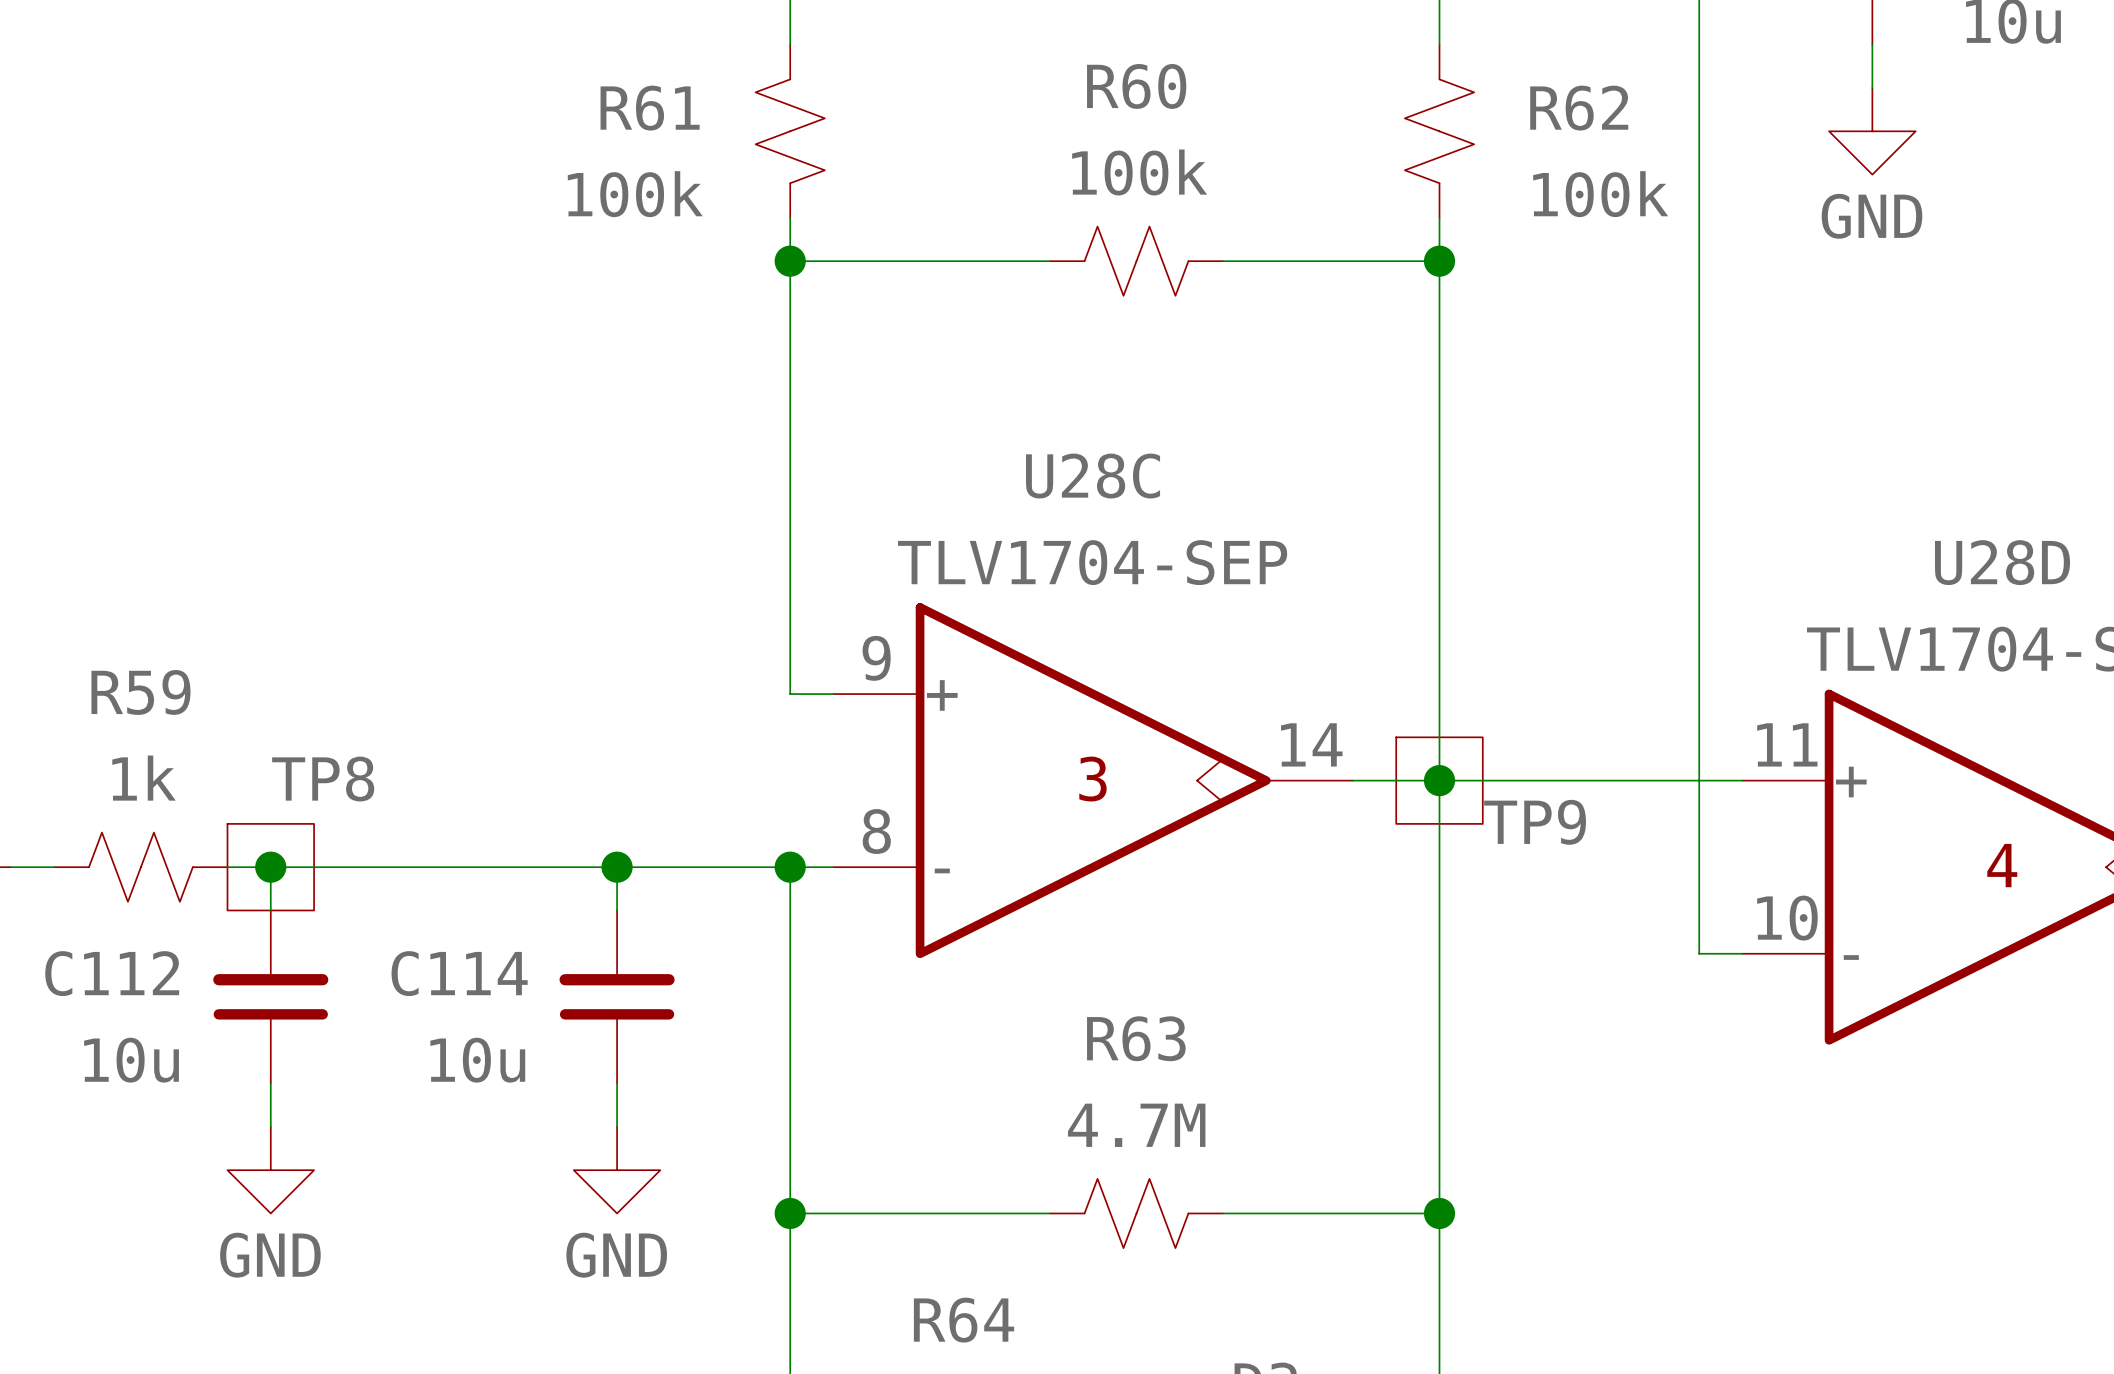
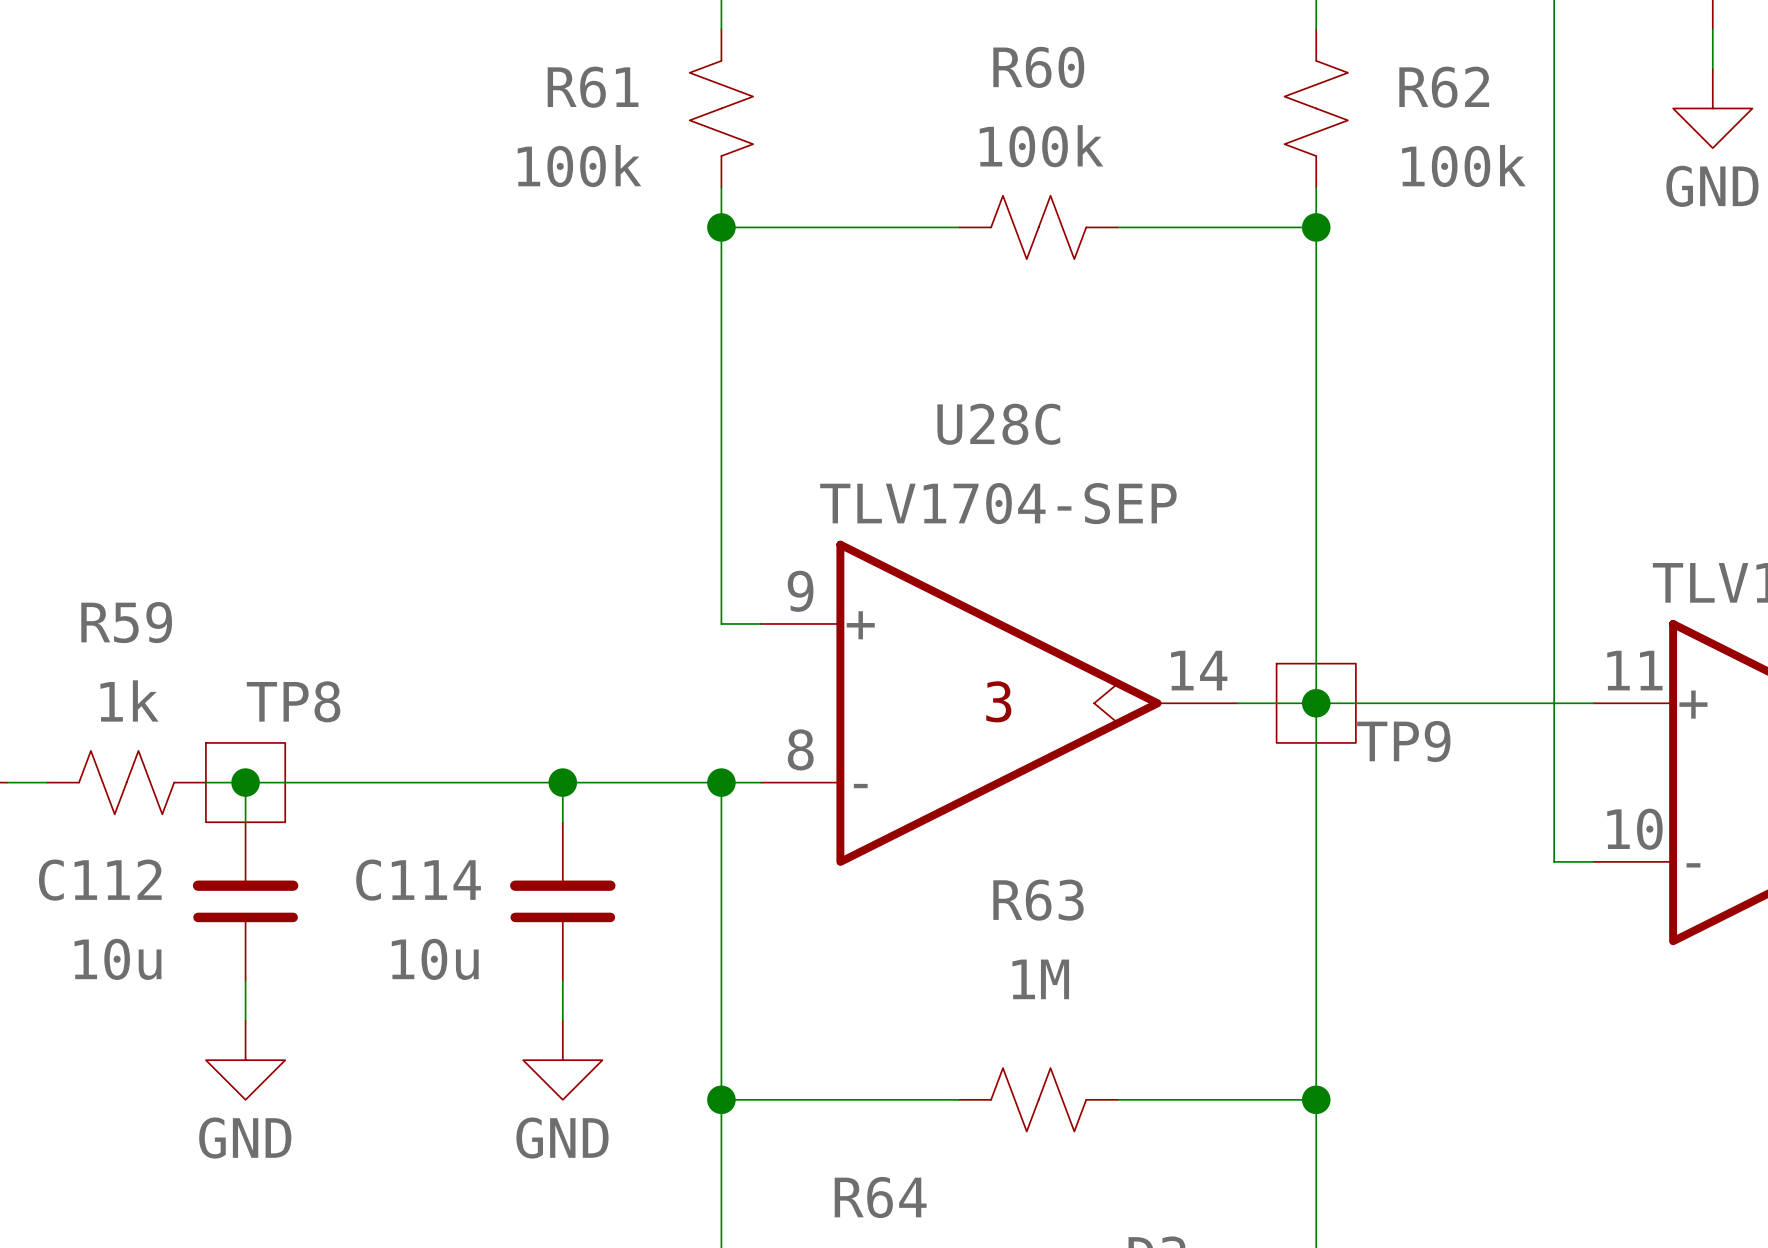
R63 name position: R63 (1136, 1038) -> R63 (1038, 900)
R63 value: 4.7M (1136, 1125) -> 1M (1040, 979)

